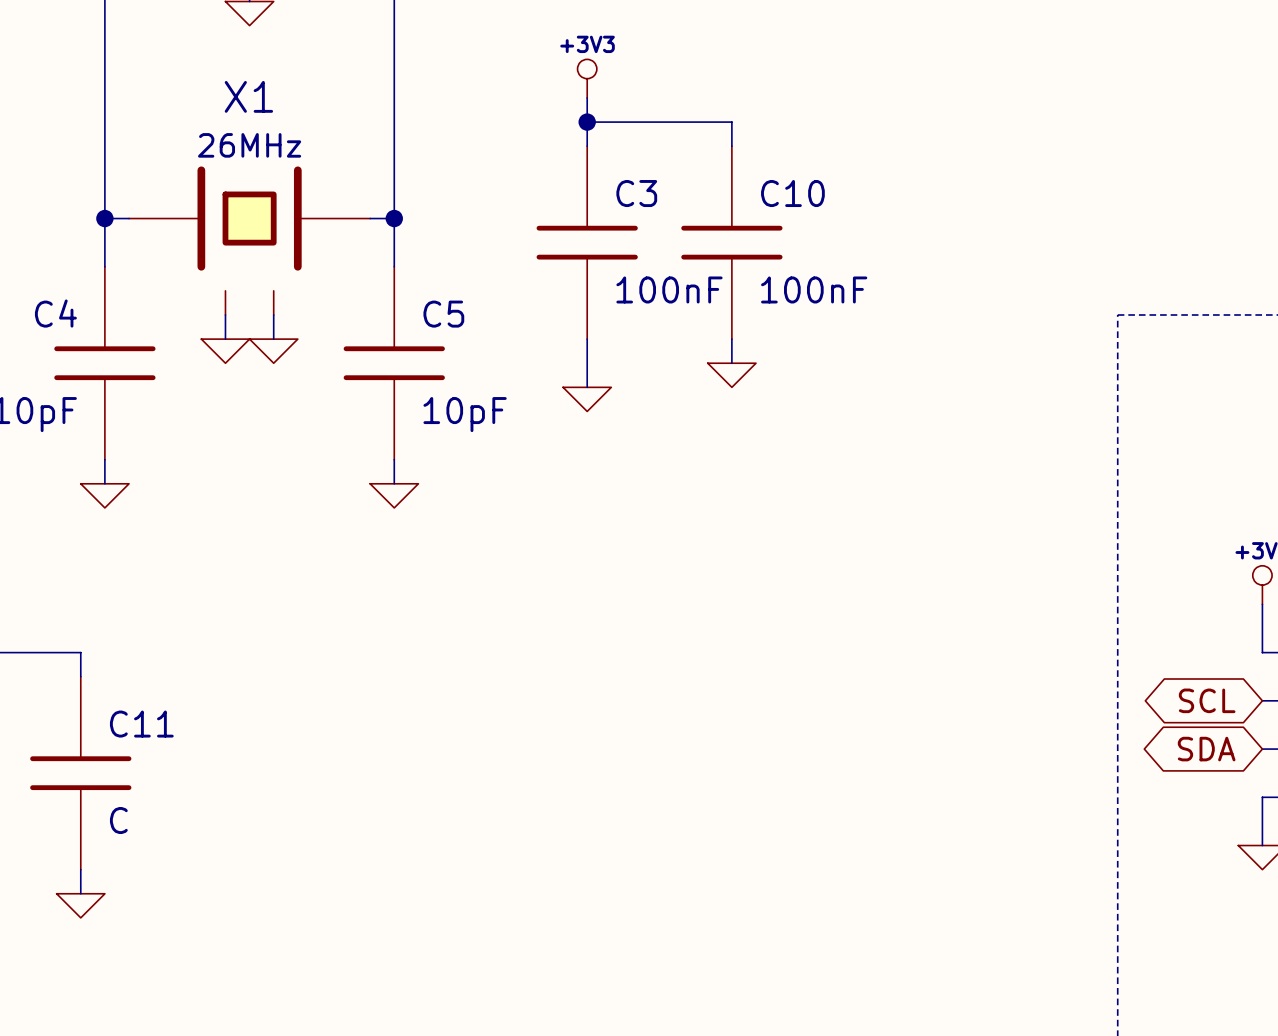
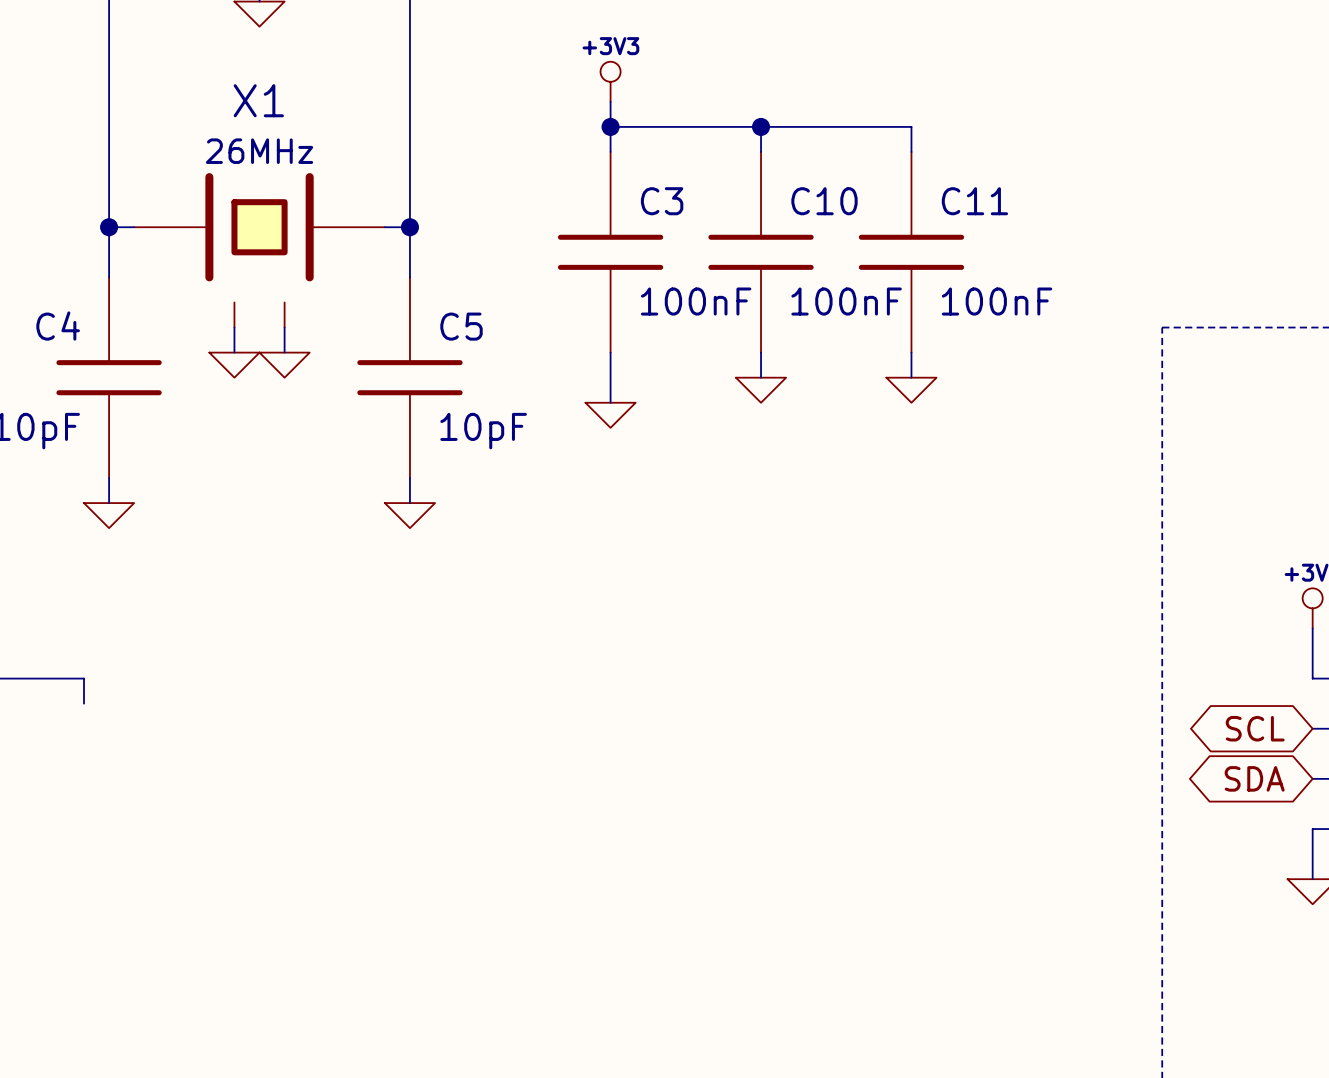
wire: none -> (761, 126) (911, 126) (911, 152)
junction: none -> (761, 126)
wire: none -> (911, 352) (911, 377)
power symbol: none -> (911, 390)
C11 position: (80, 773) -> (911, 252)
C11 value: C (118, 820) -> 100nF (997, 301)
wire: (80, 869) (80, 893) -> none
power symbol: (80, 905) -> none

